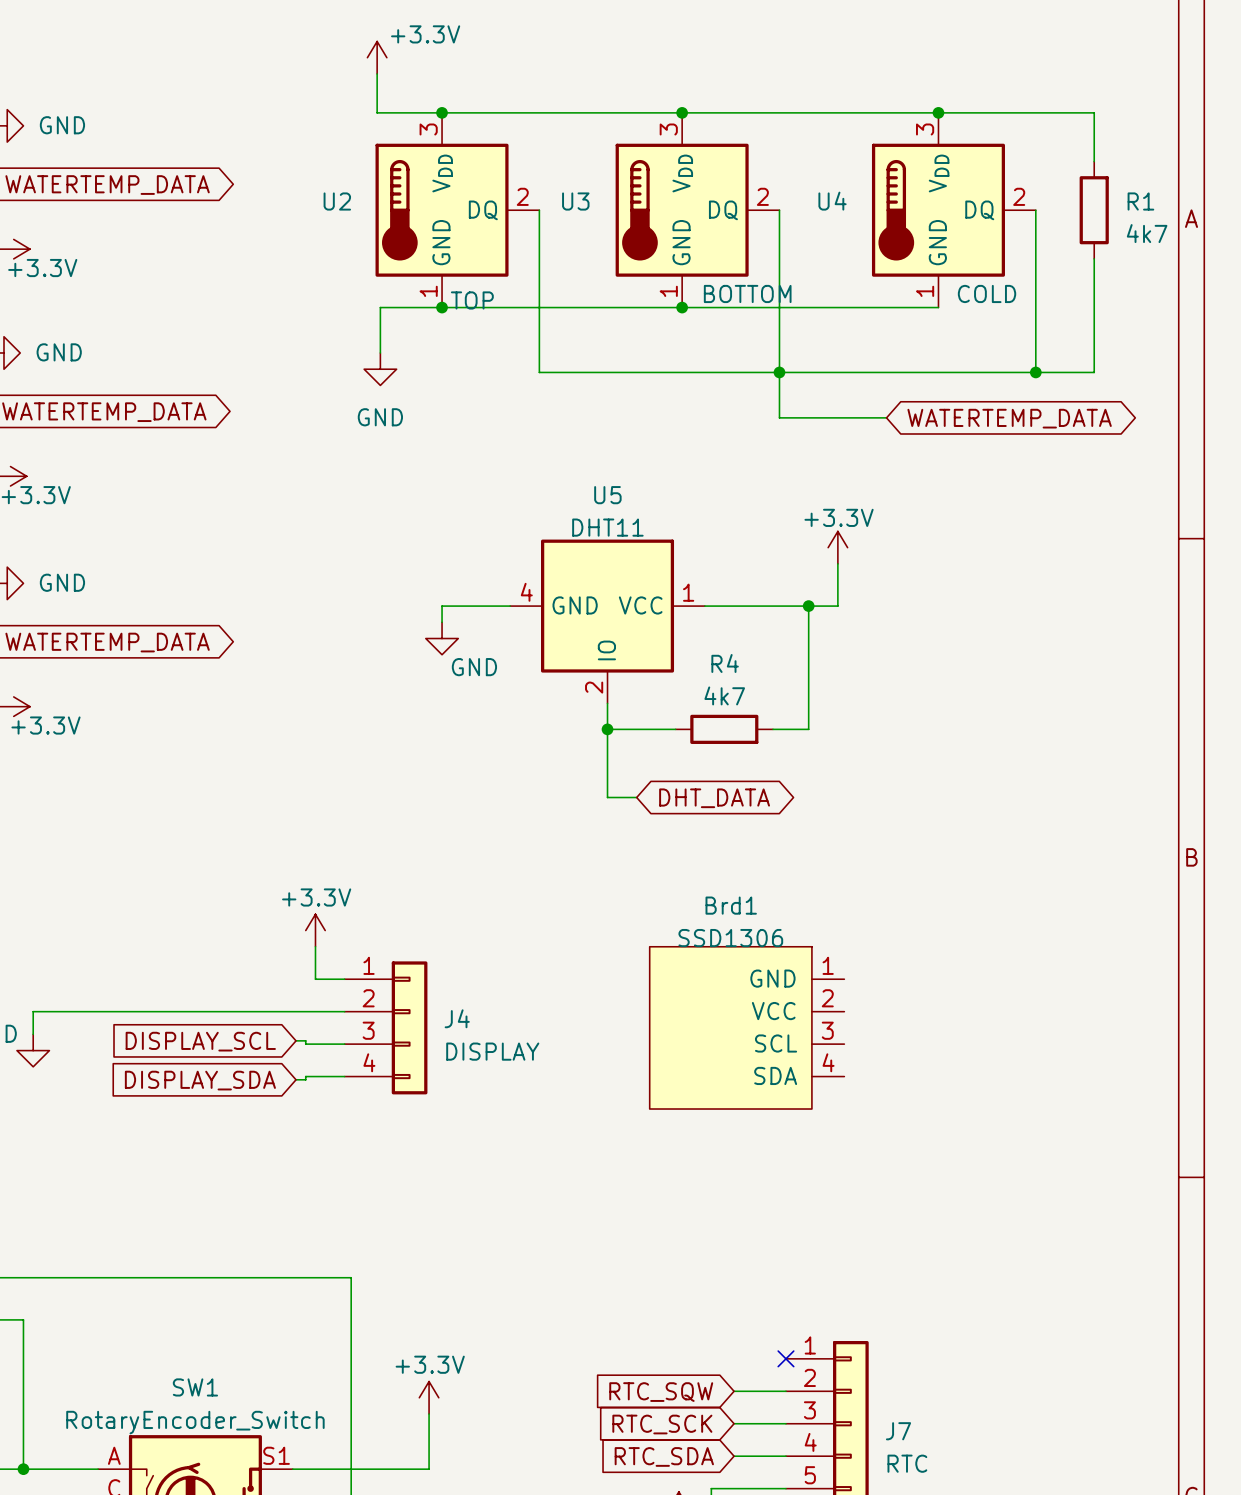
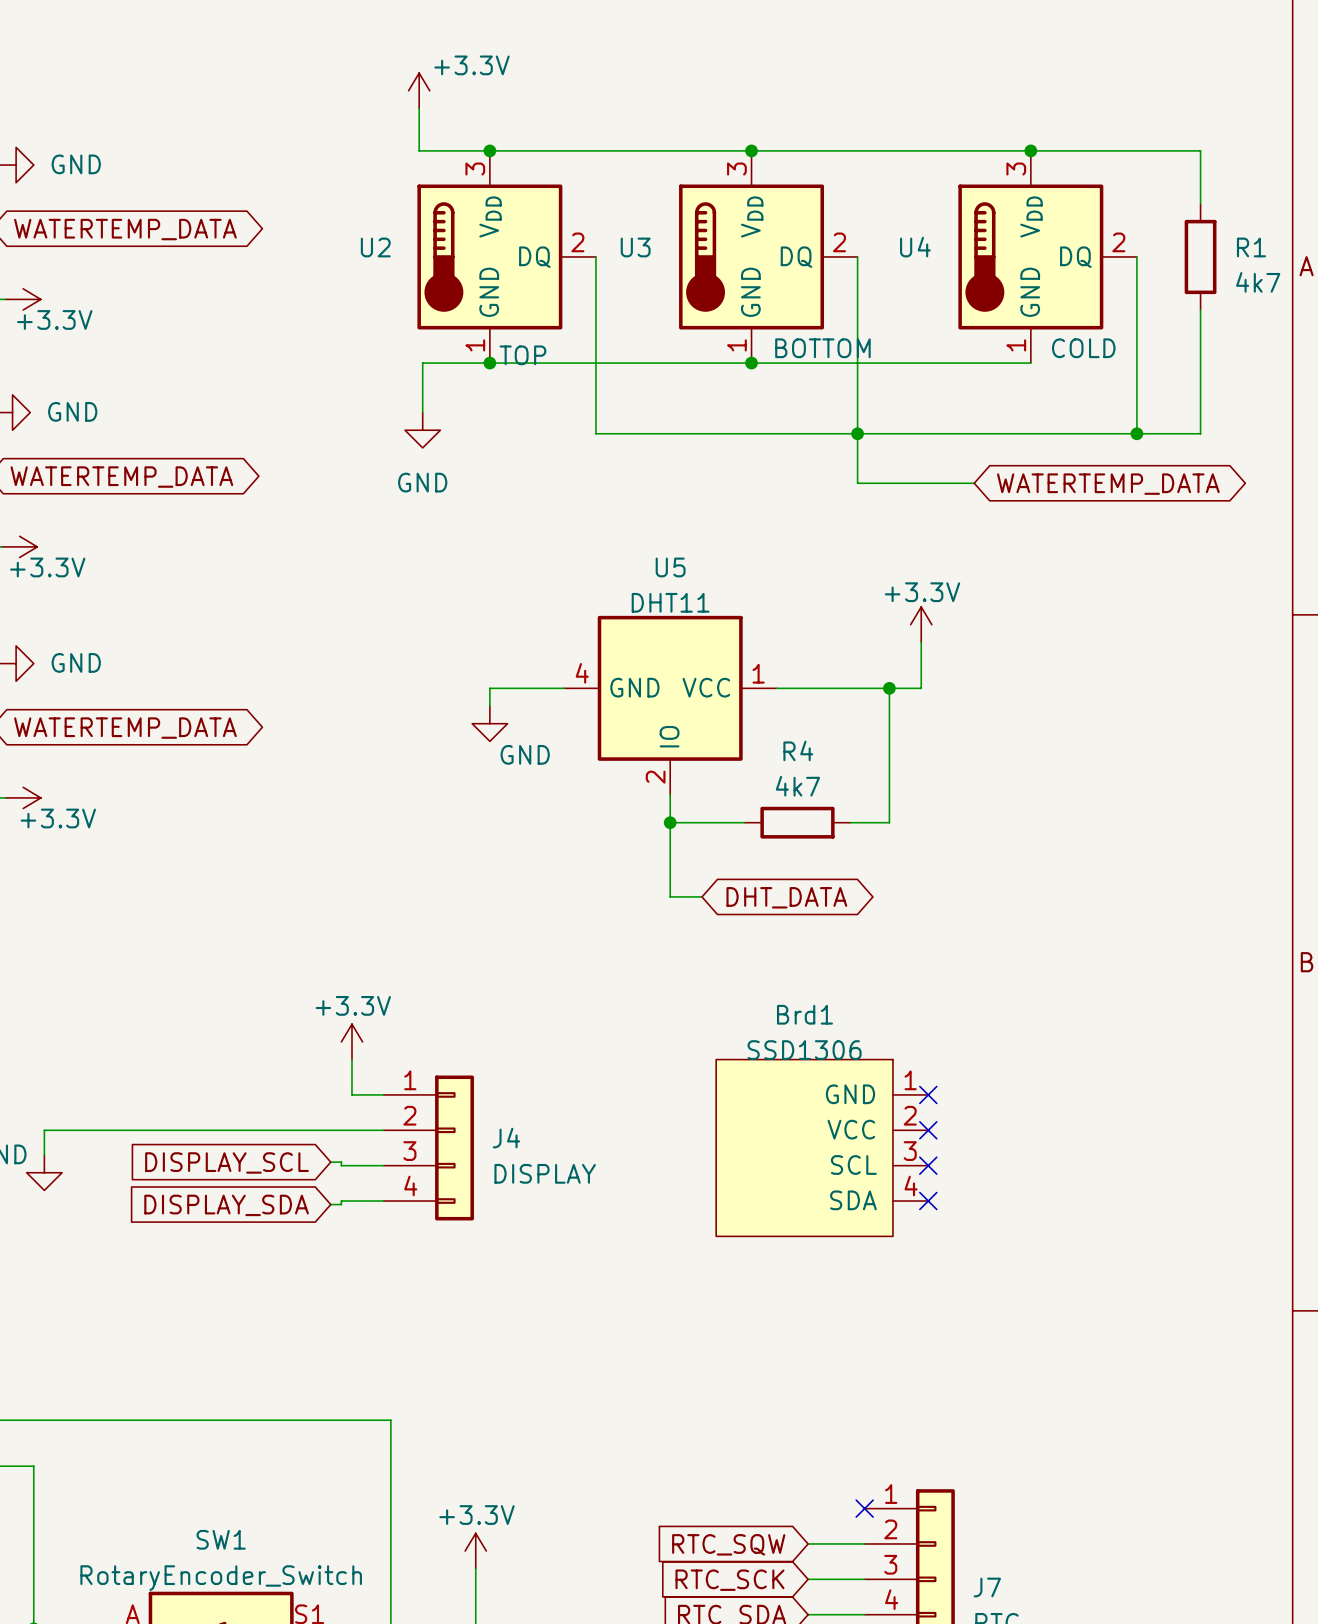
no-connect mark: none -> (928, 1094)
no-connect mark: none -> (928, 1130)
no-connect mark: none -> (928, 1165)
no-connect mark: none -> (928, 1201)

